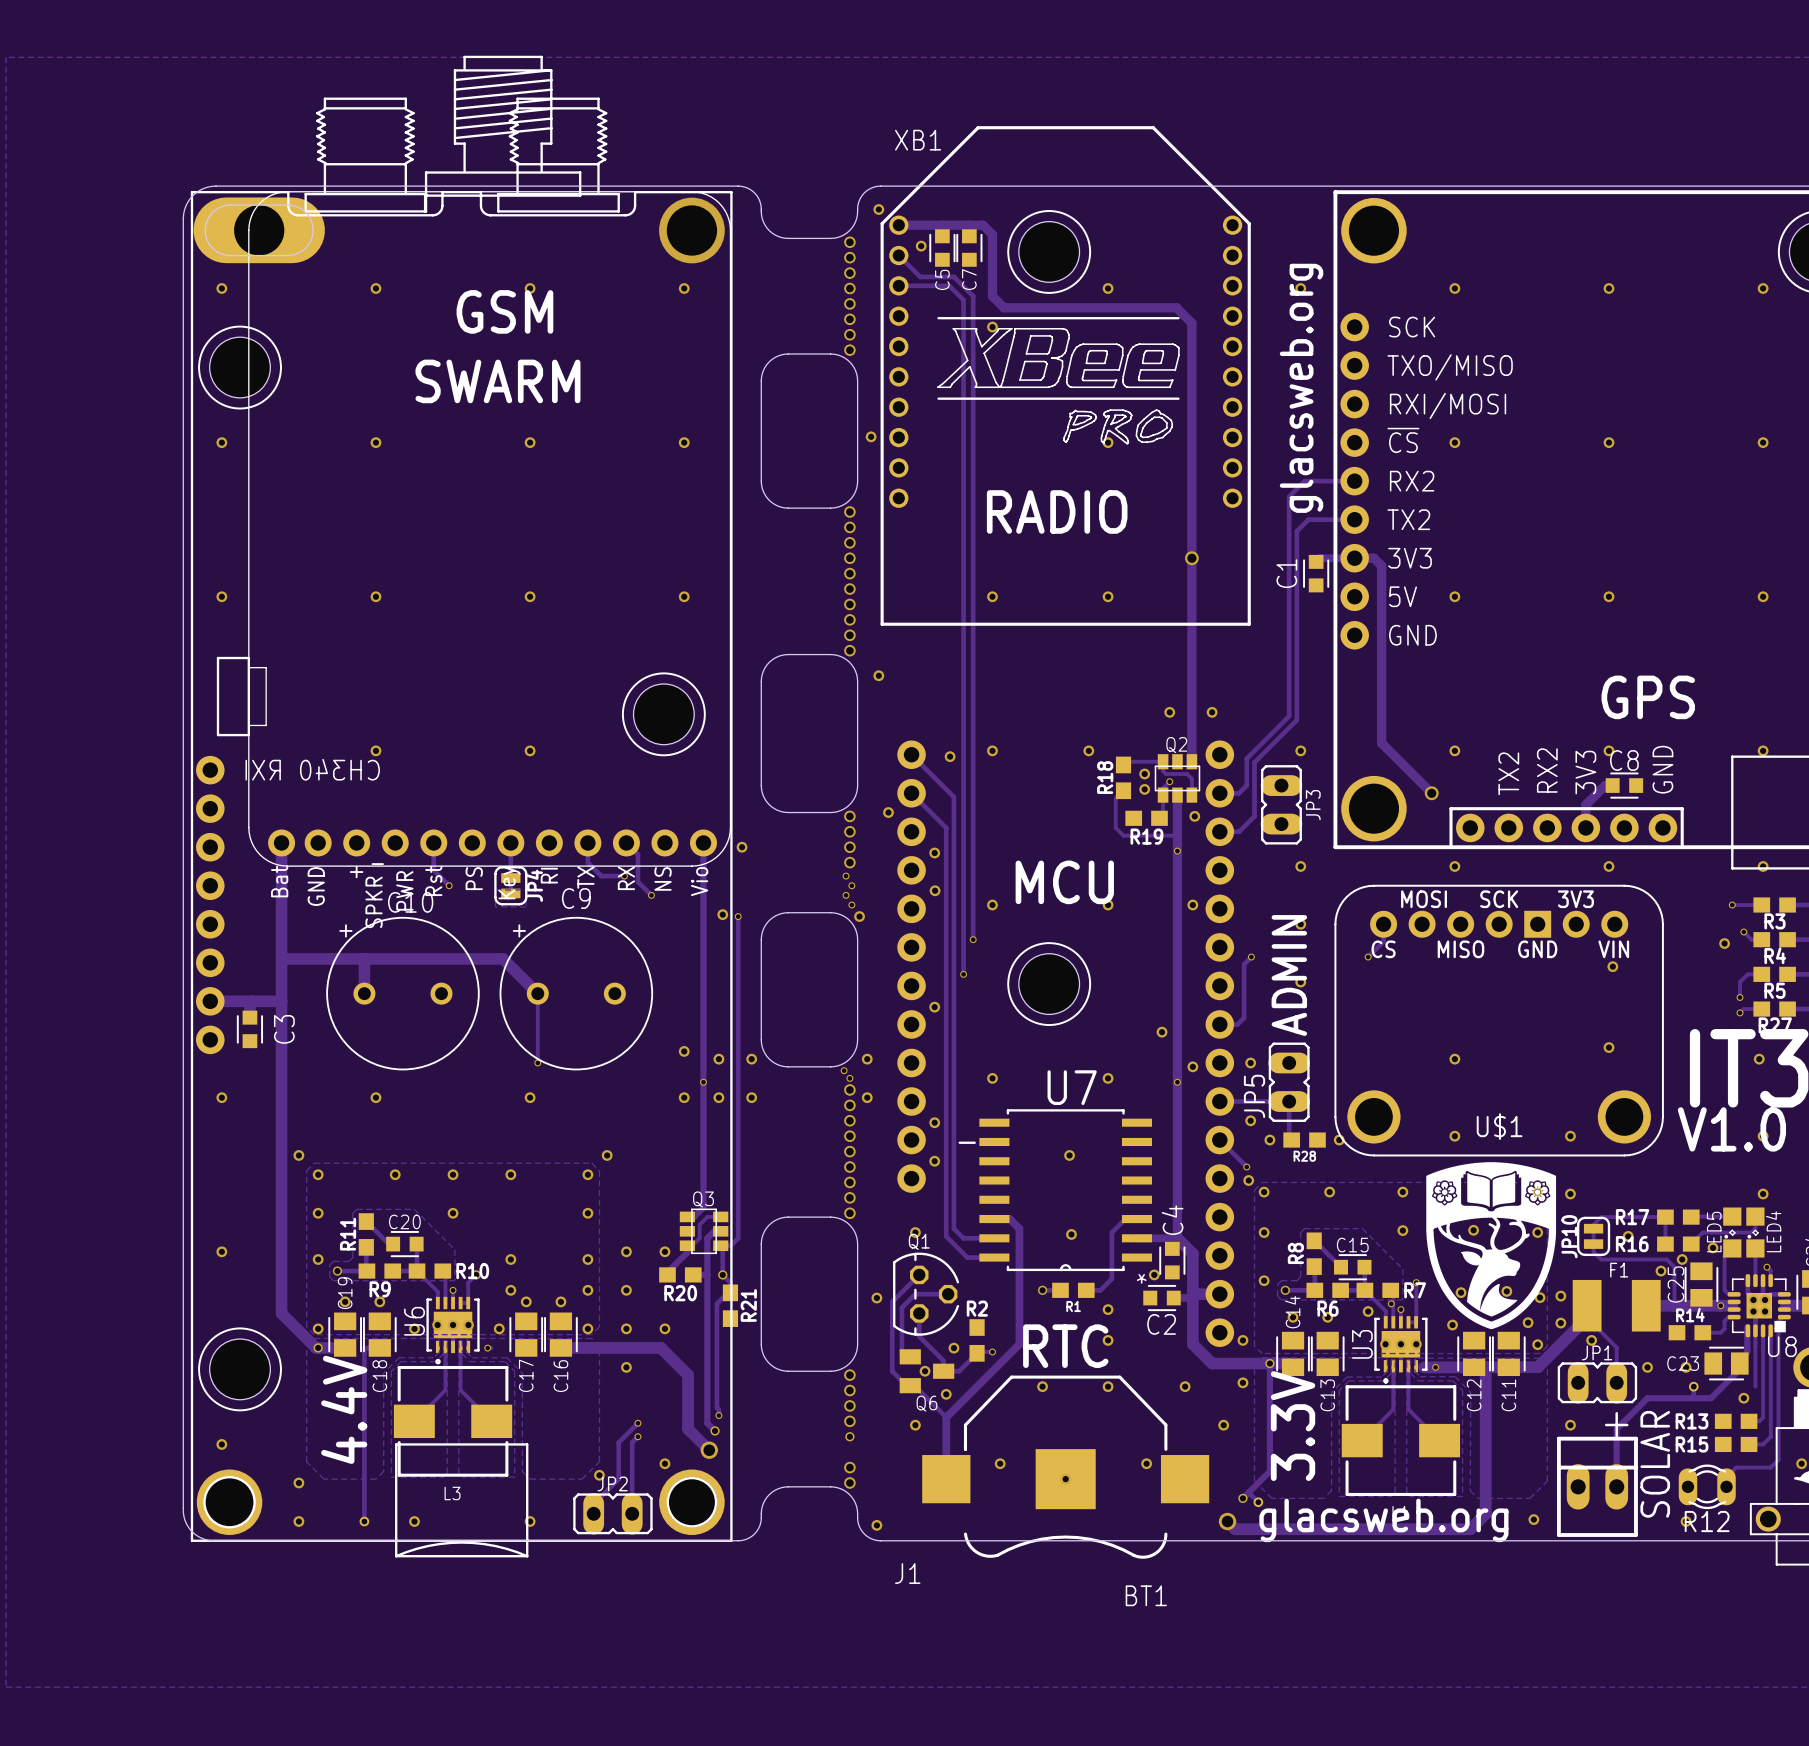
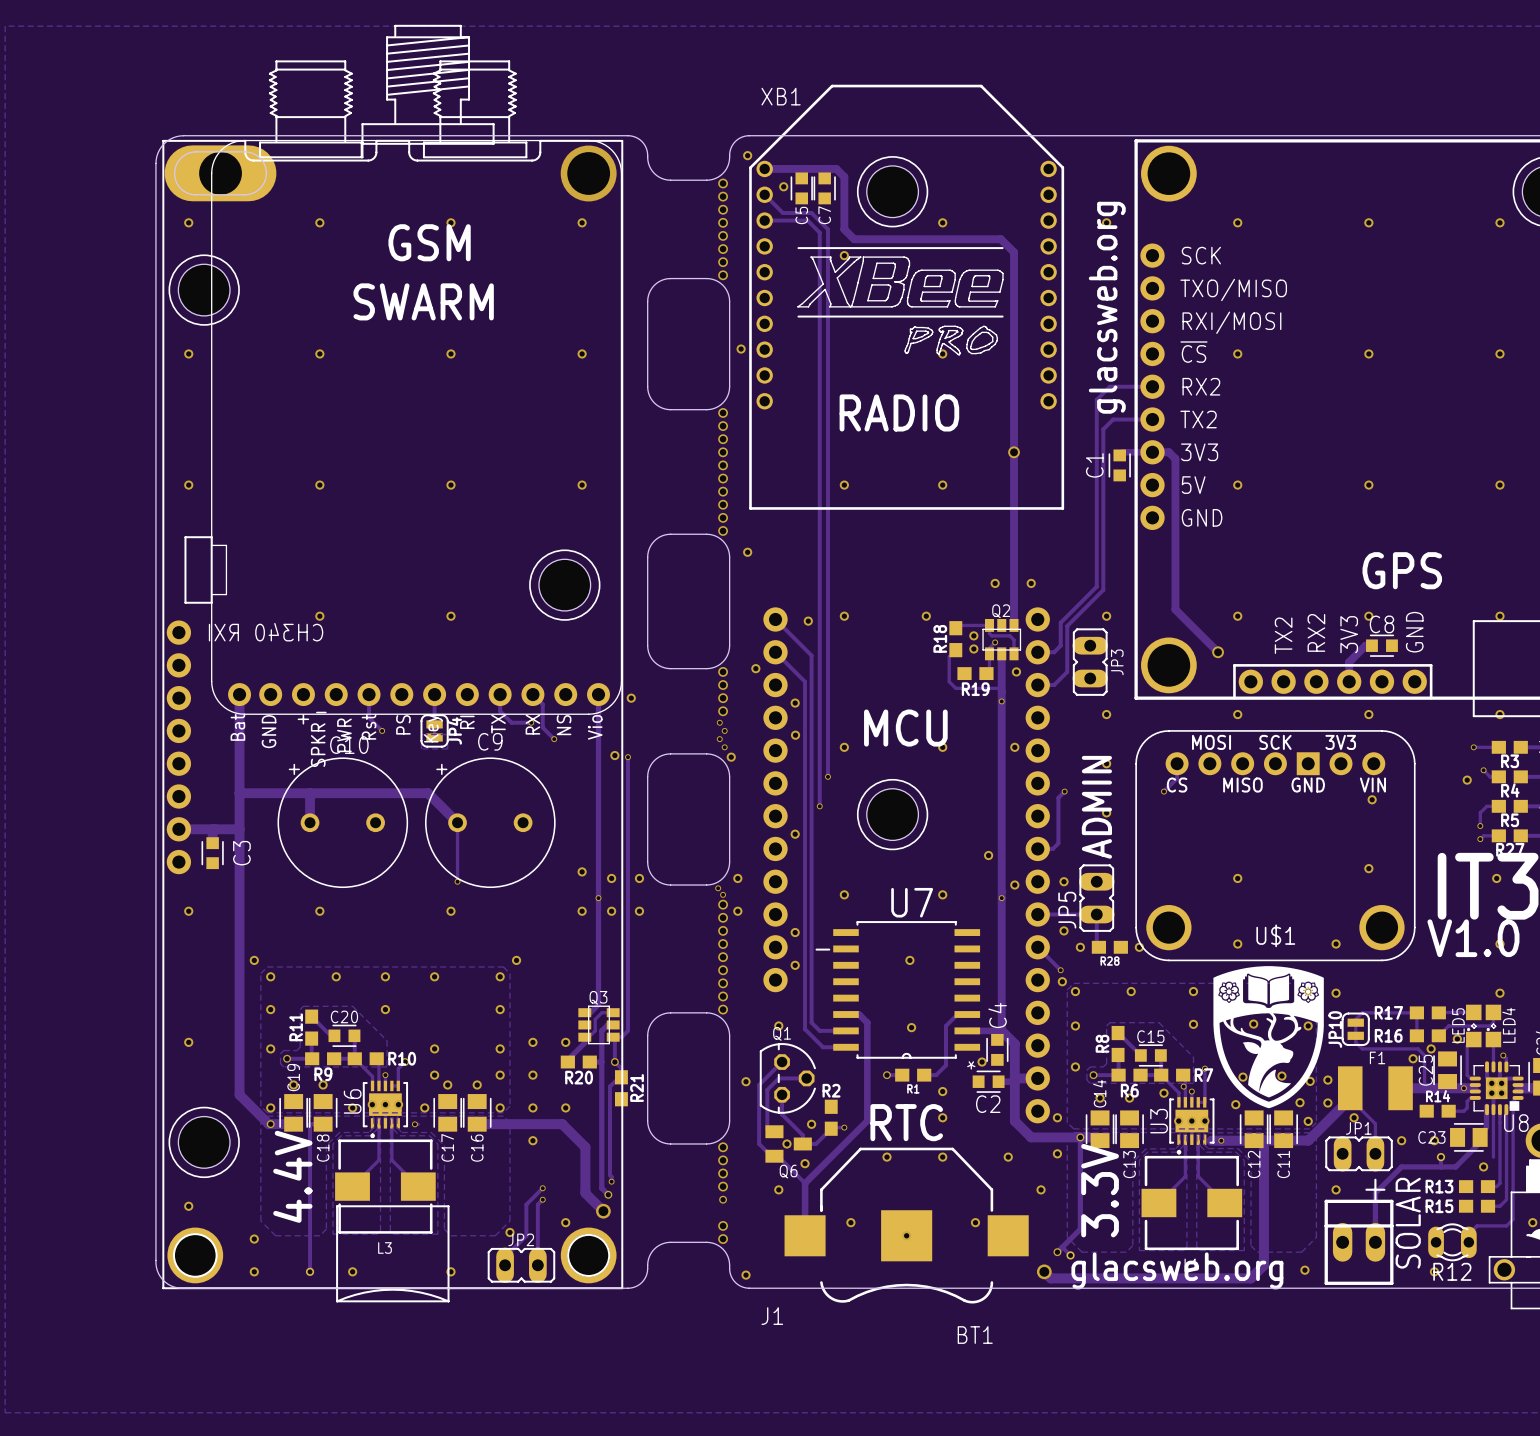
via: (1628, 1236) -> none

